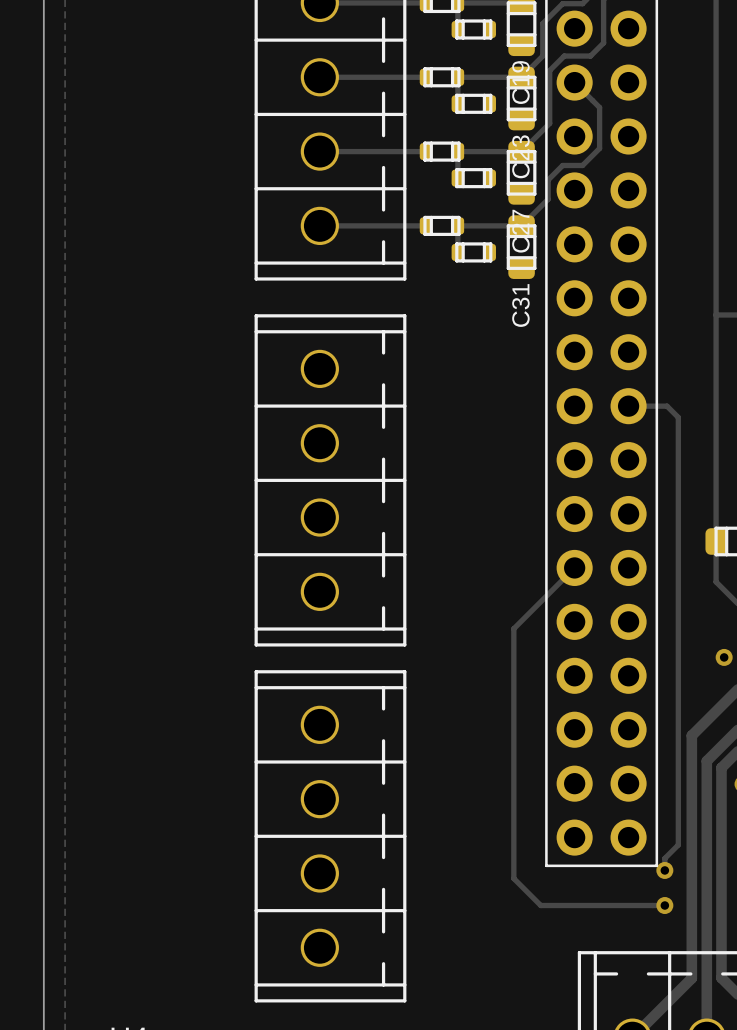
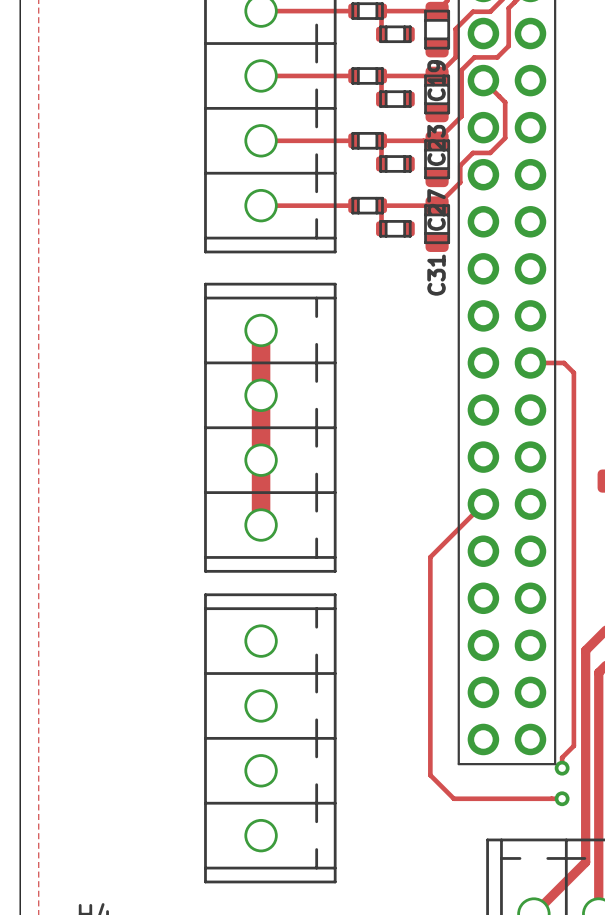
track: none -> (261, 330) (261, 525)

